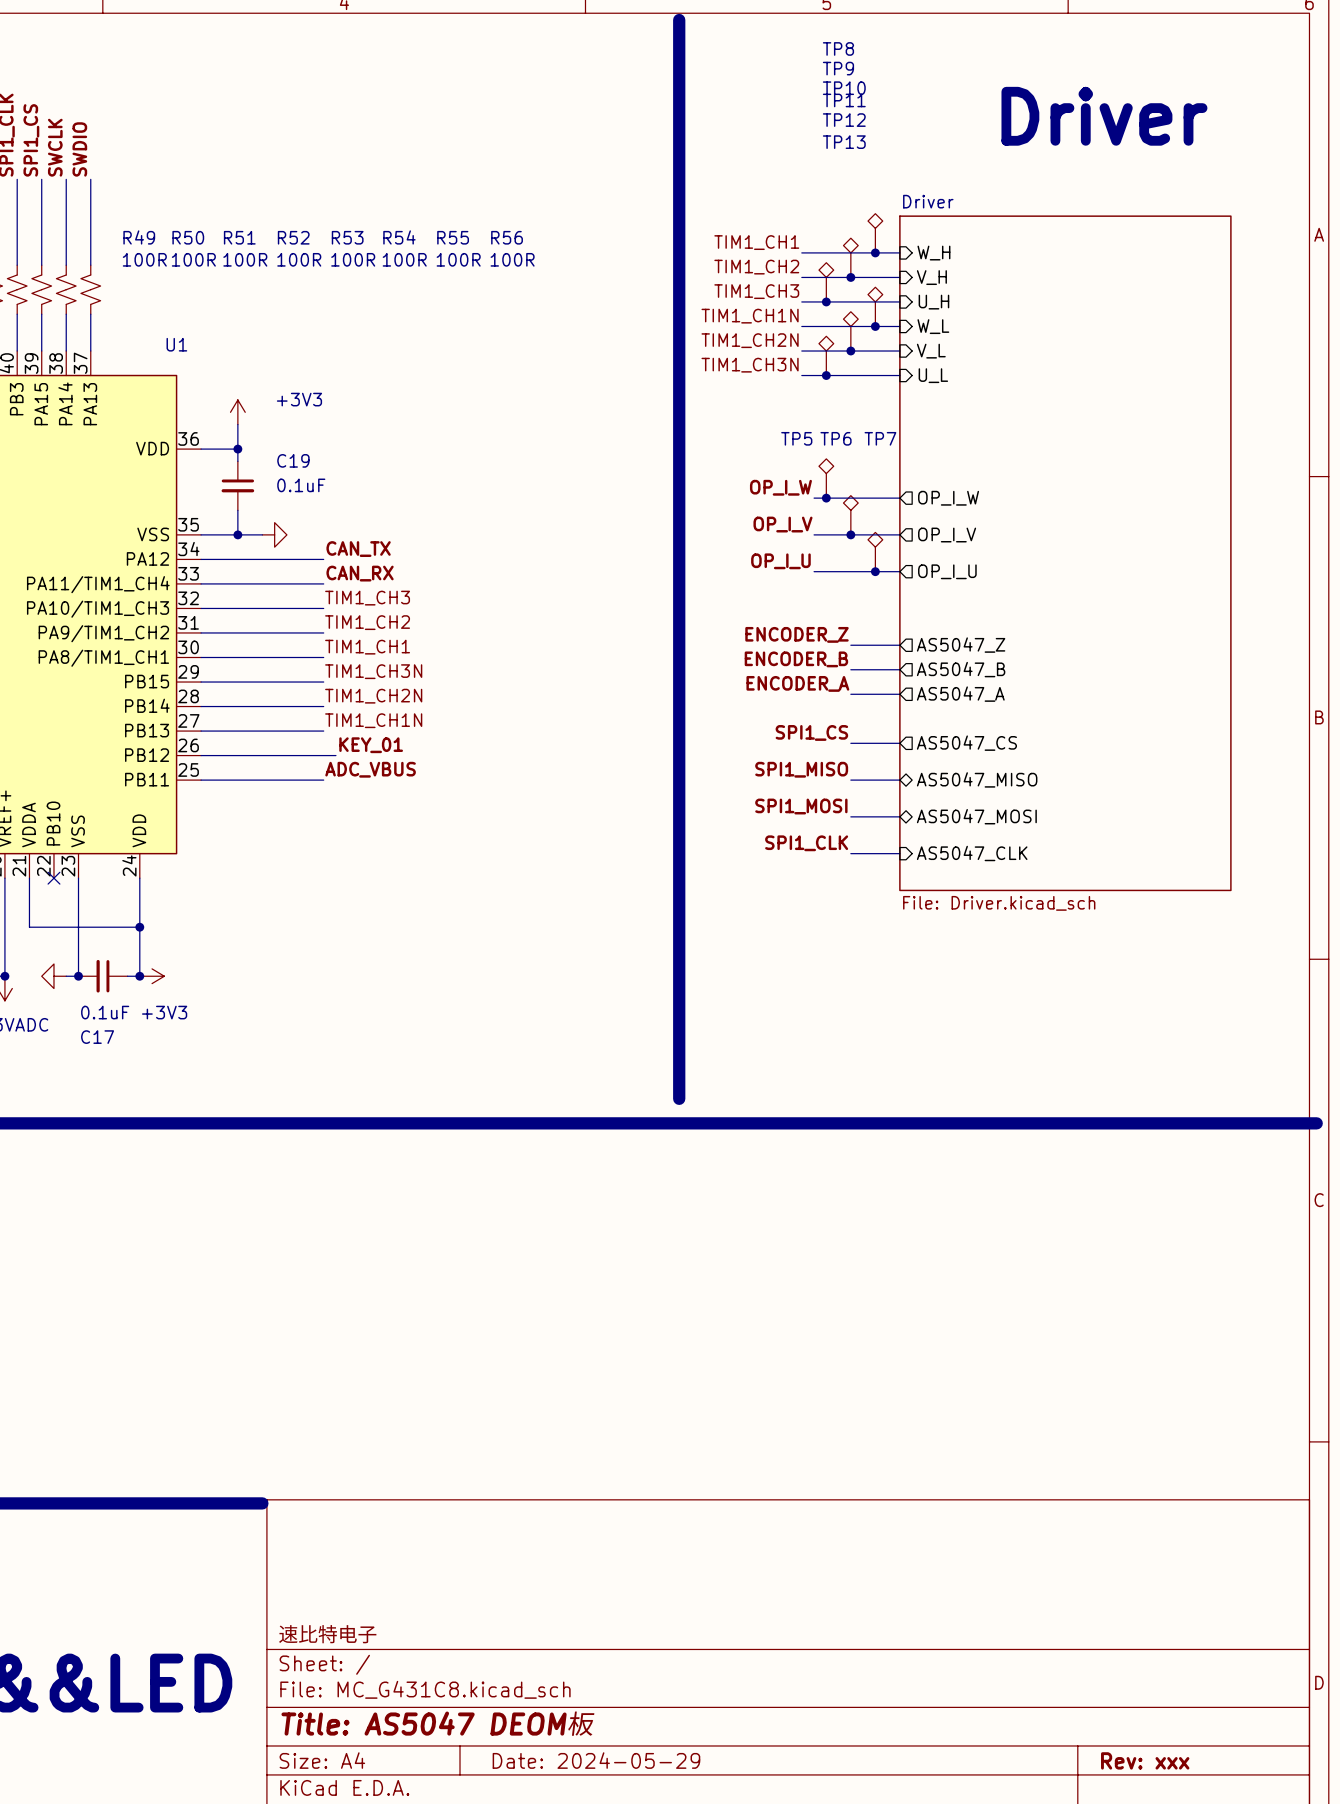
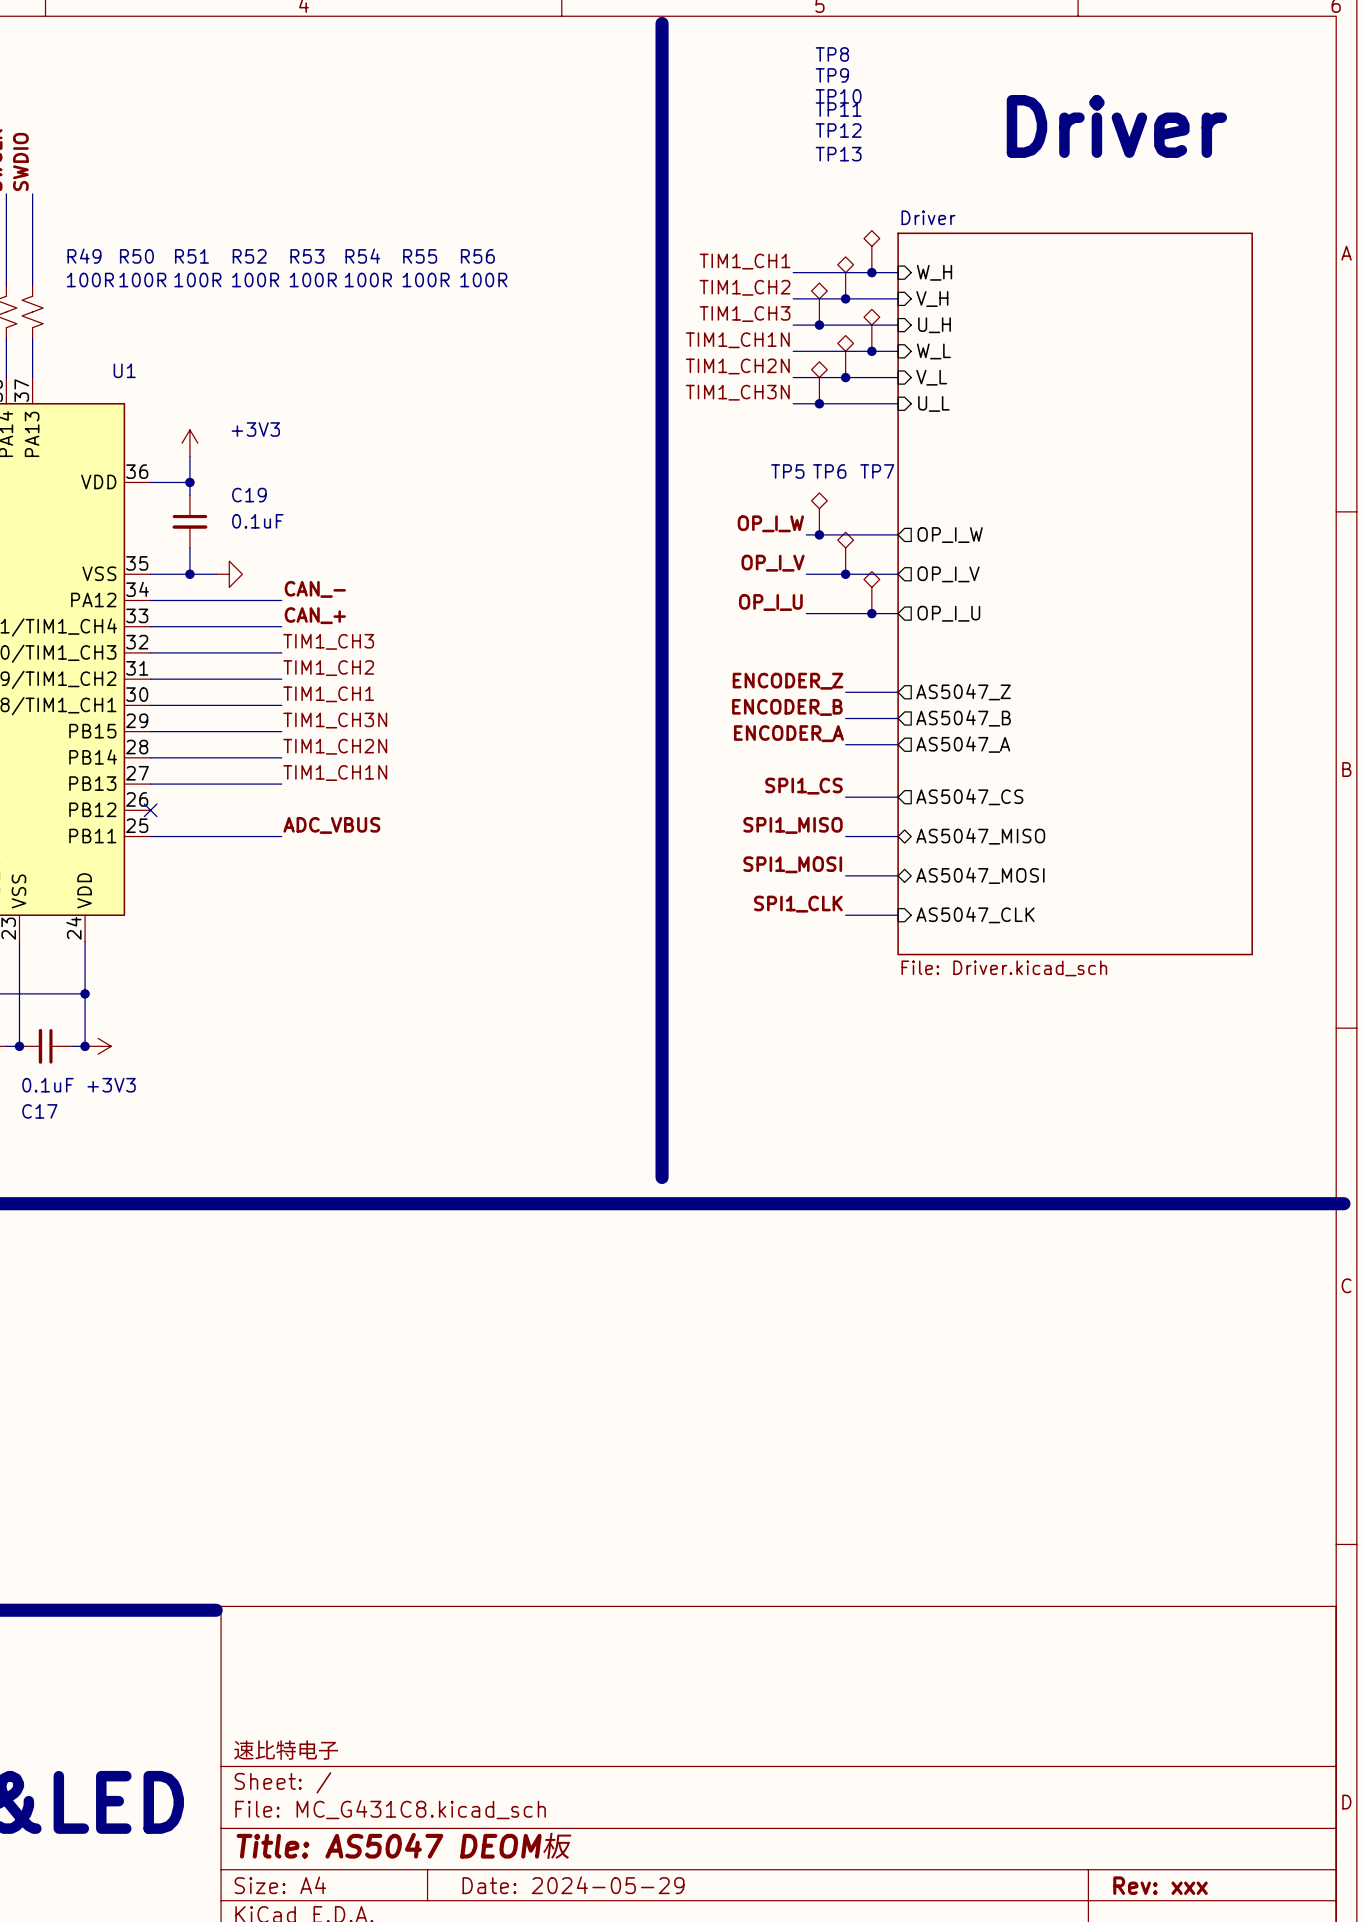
label: CAN_TX (358, 549) -> CAN_- (315, 589)
label: CAN_RX (360, 573) -> CAN_+ (315, 615)
label: KEY_01 (371, 745) -> none
wire: (201, 755) (335, 755) -> none
no-connect mark: none -> (150, 810)

